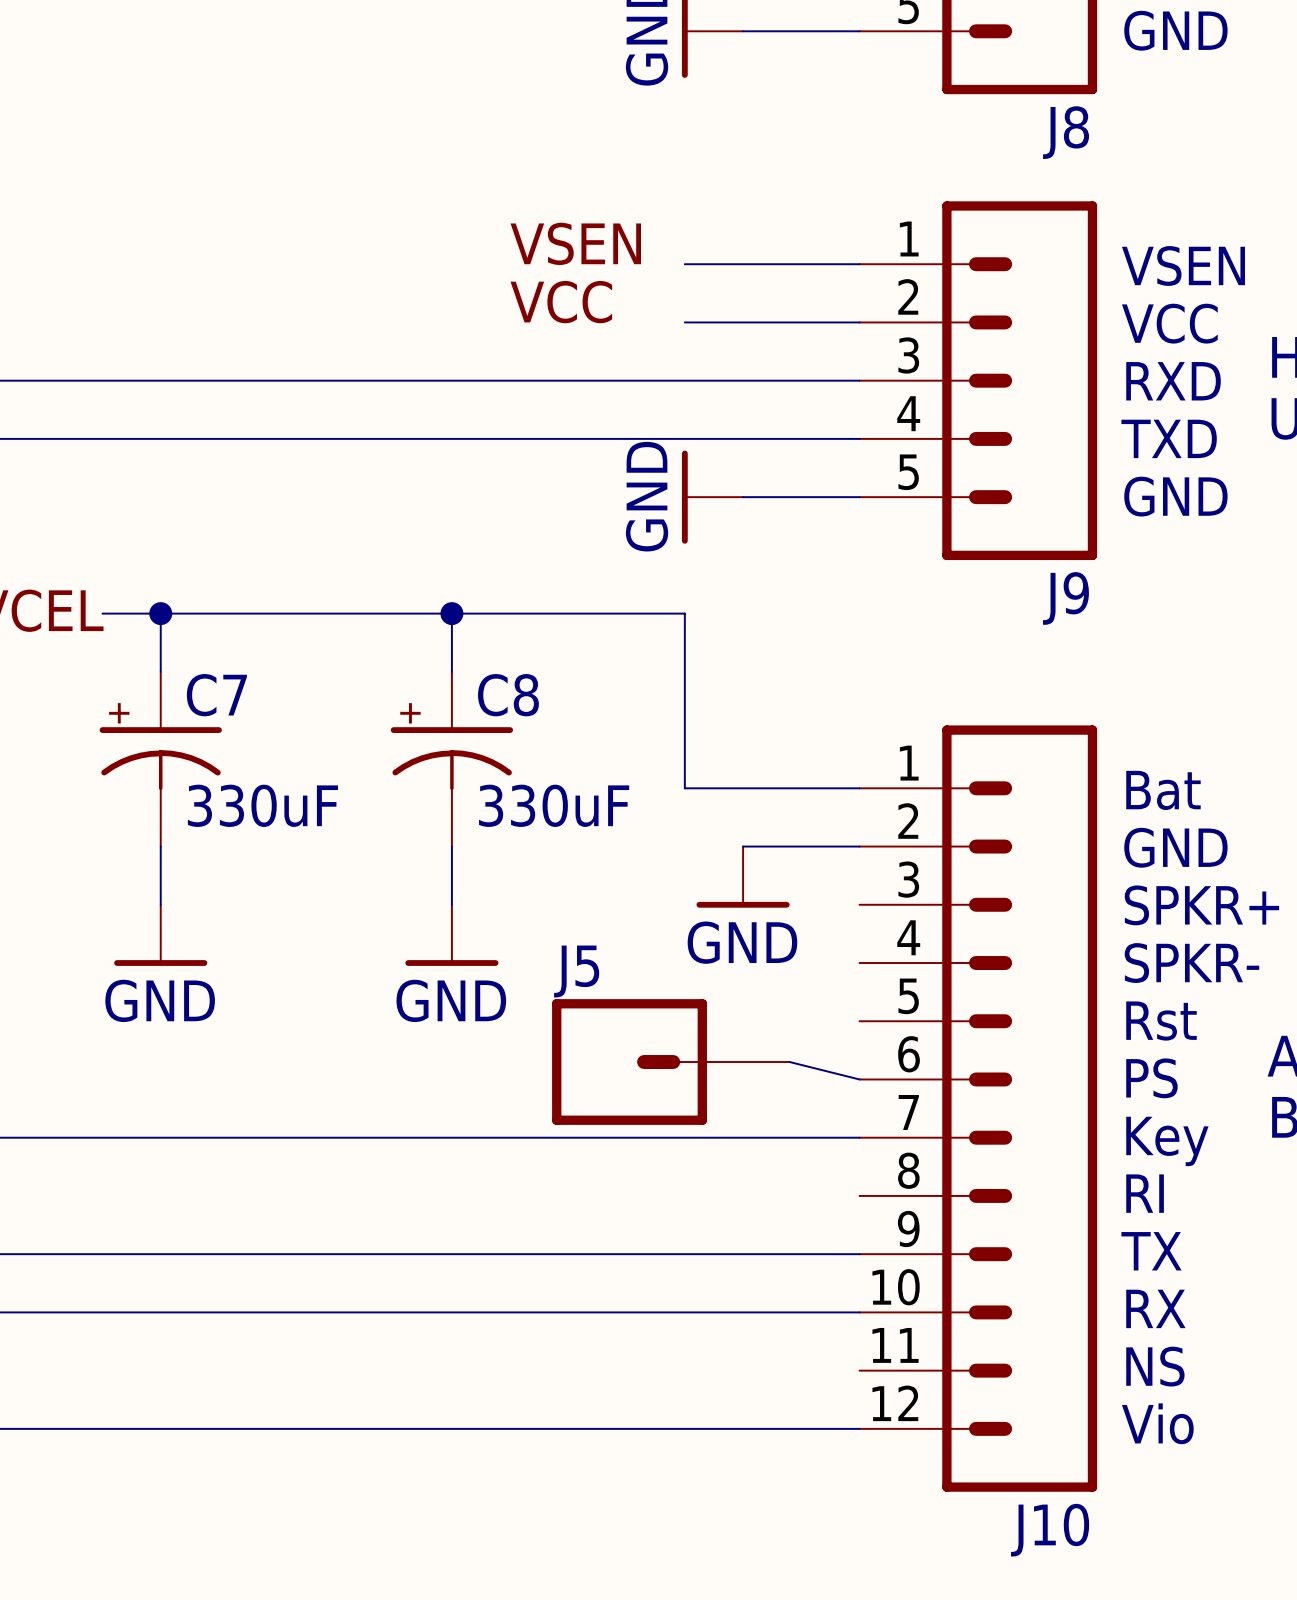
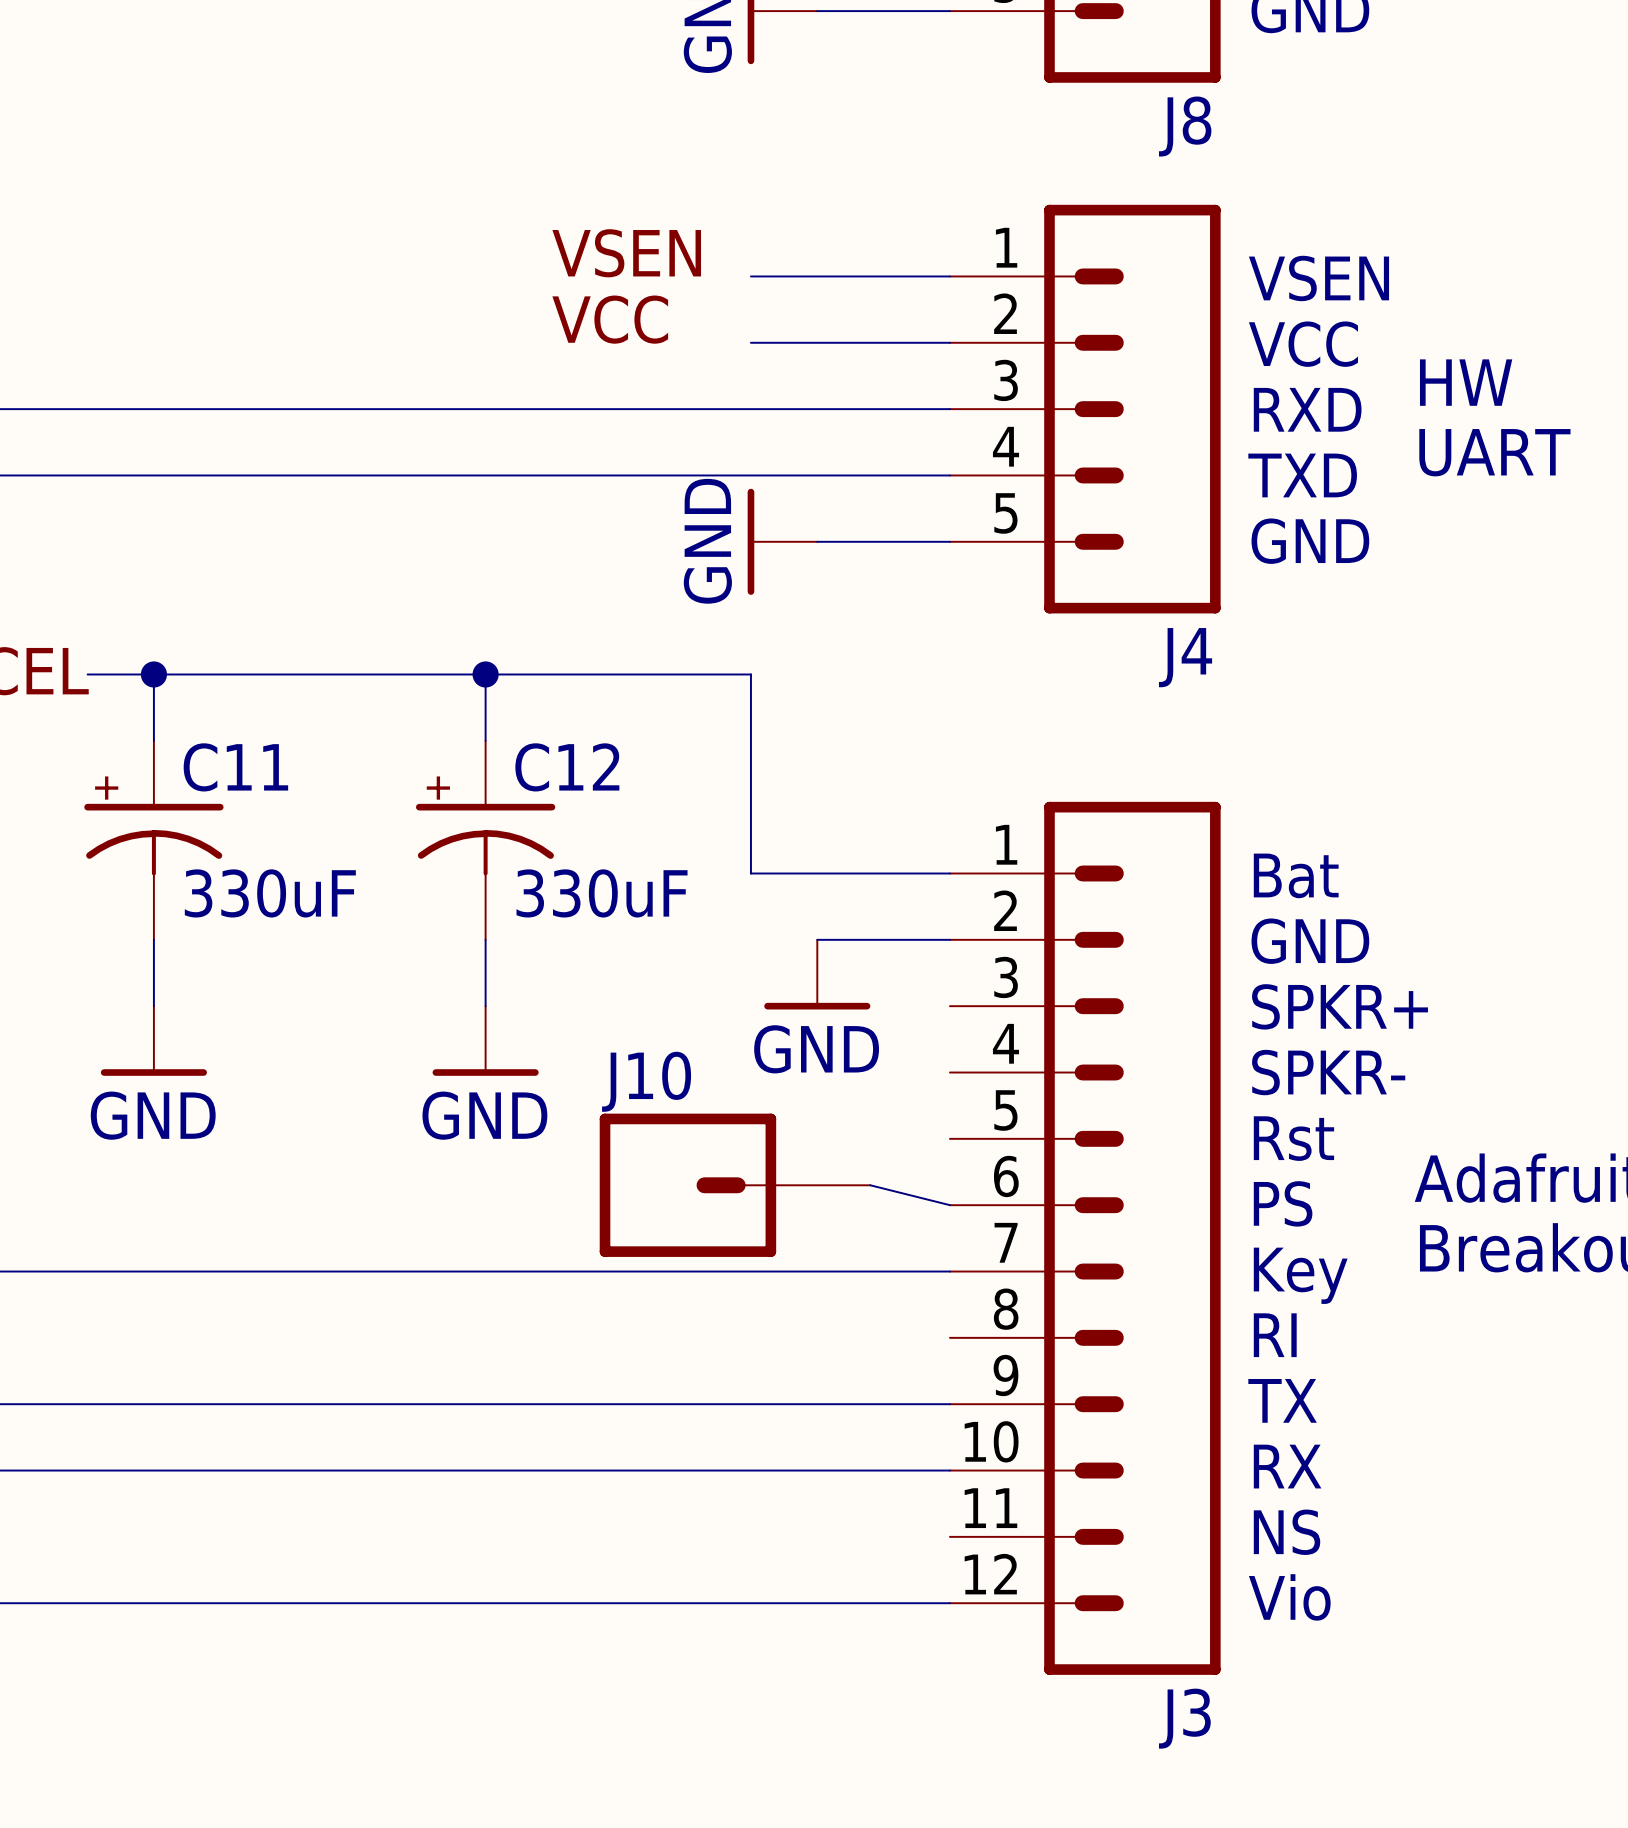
J9 name: J9 (1065, 598) -> J4 (1185, 657)
C7 name: C7 (216, 695) -> C11 (235, 767)
C8 name: C8 (508, 695) -> C12 (567, 767)
J5 name: J5 (576, 971) -> J10 (646, 1081)
J10 name: J10 (1050, 1530) -> J3 (1184, 1718)

